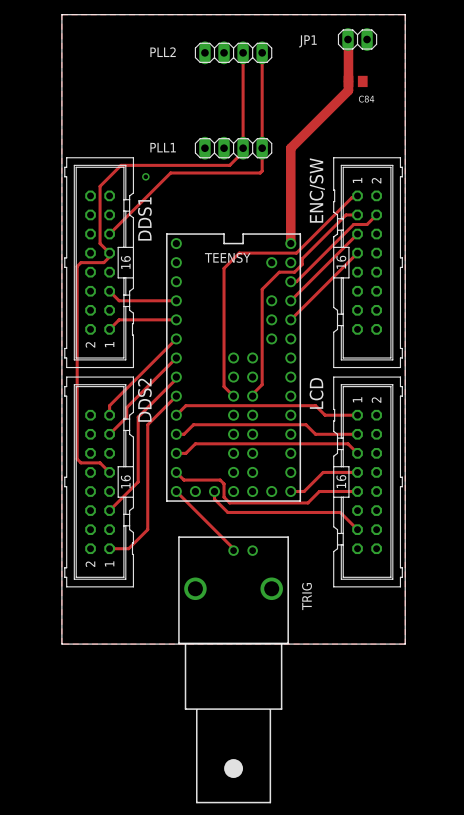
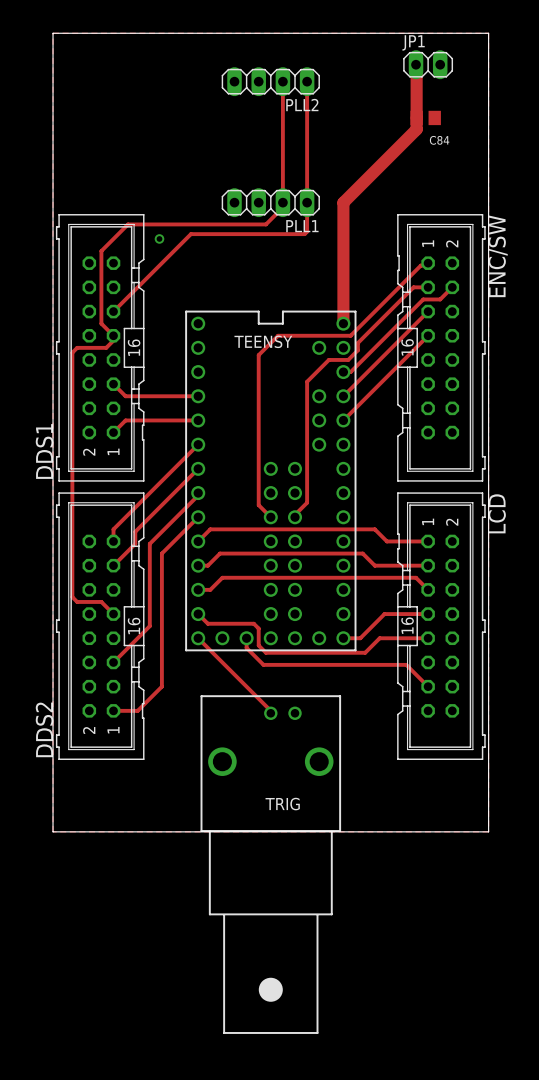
JP1 name position: JP1 (307, 41) -> JP1 (413, 42)
PLL2 name position: PLL2 (163, 52) -> PLL2 (302, 105)
PLL1 name position: PLL1 (163, 147) -> PLL1 (302, 226)
ENC/SW name position: ENC/SW (317, 190) -> ENC/SW (498, 256)
DDS1 name position: DDS1 (144, 219) -> DDS1 (44, 451)
LCD name position: LCD (316, 393) -> LCD (497, 513)
DDS2 name position: DDS2 (144, 400) -> DDS2 (44, 729)
TRIG name rotation: 0° (307, 596) -> 90° clockwise (282, 804)
TRIG name position: TRIG (307, 596) -> TRIG (282, 804)

